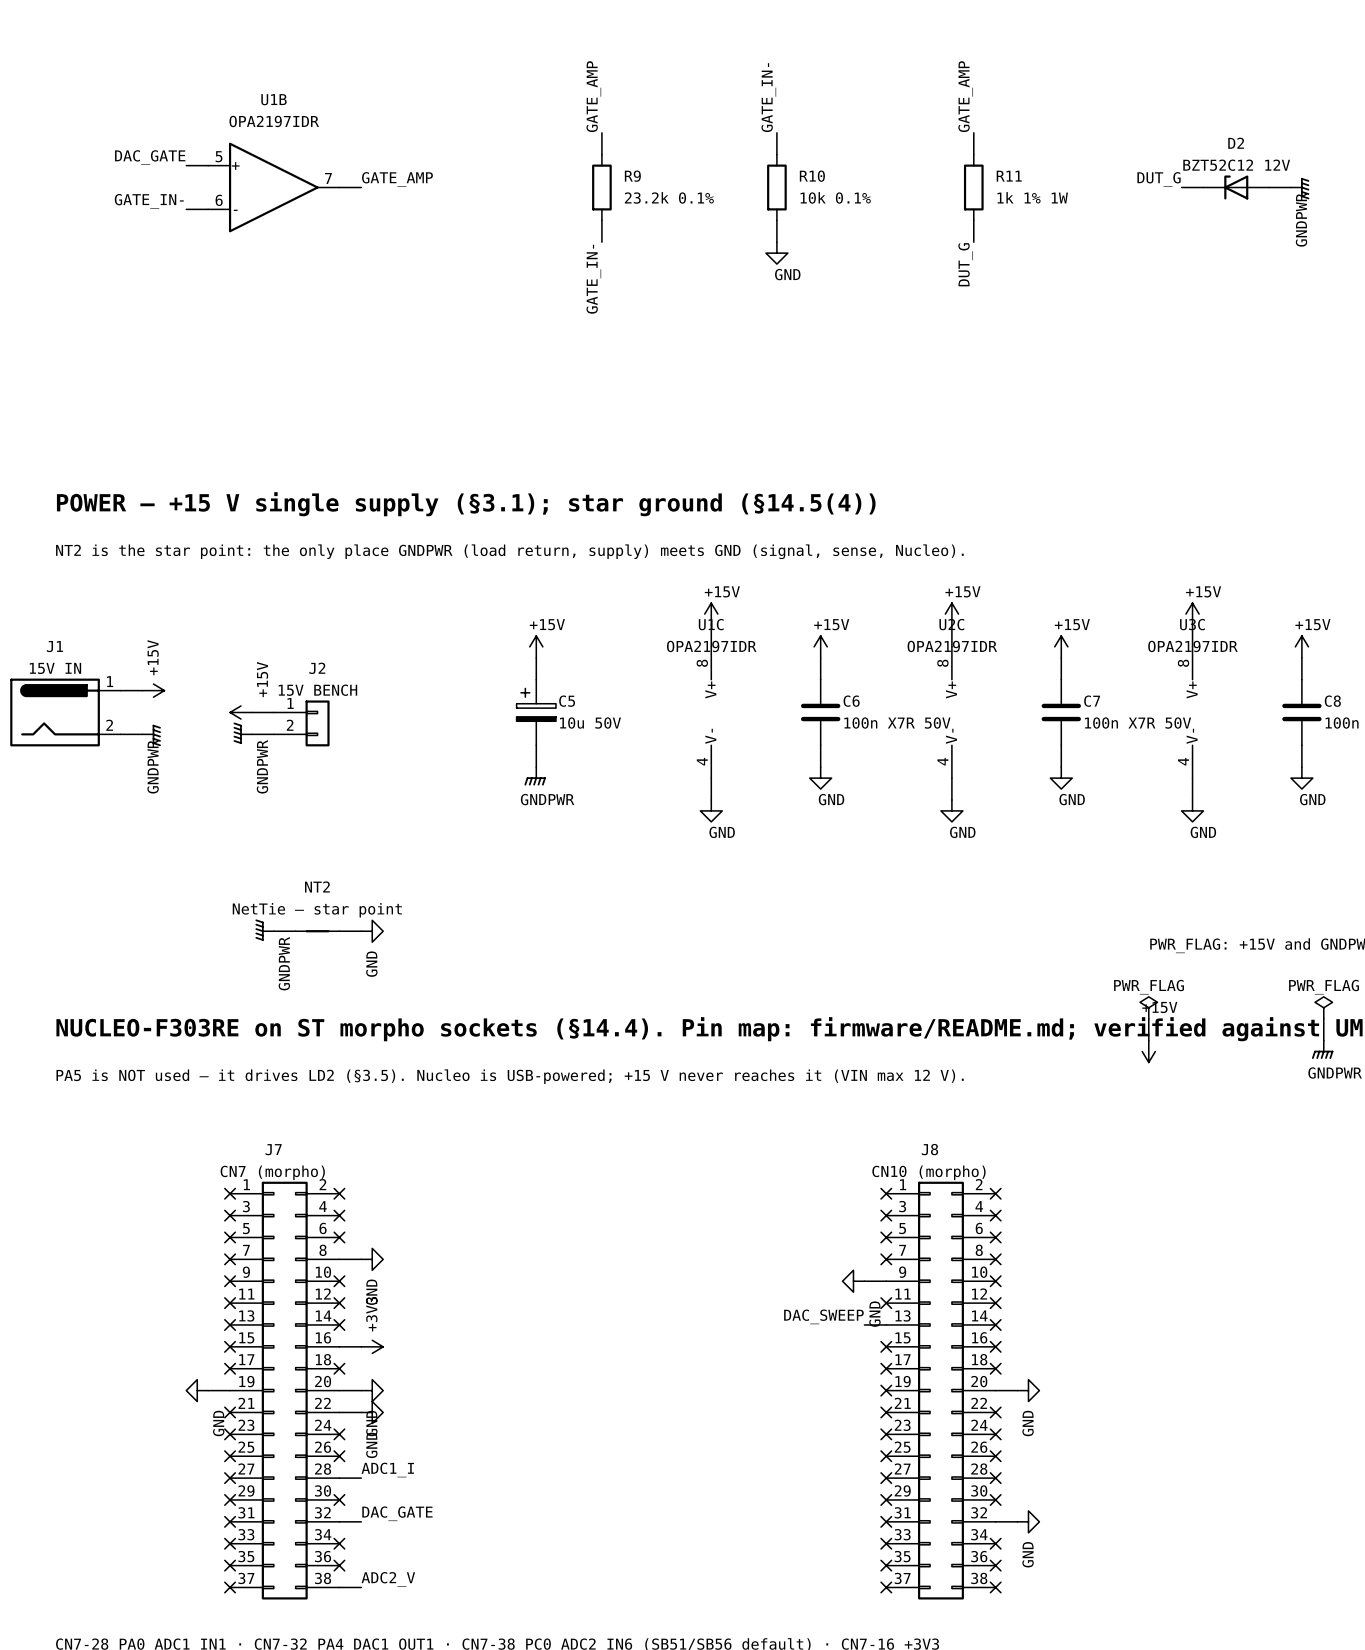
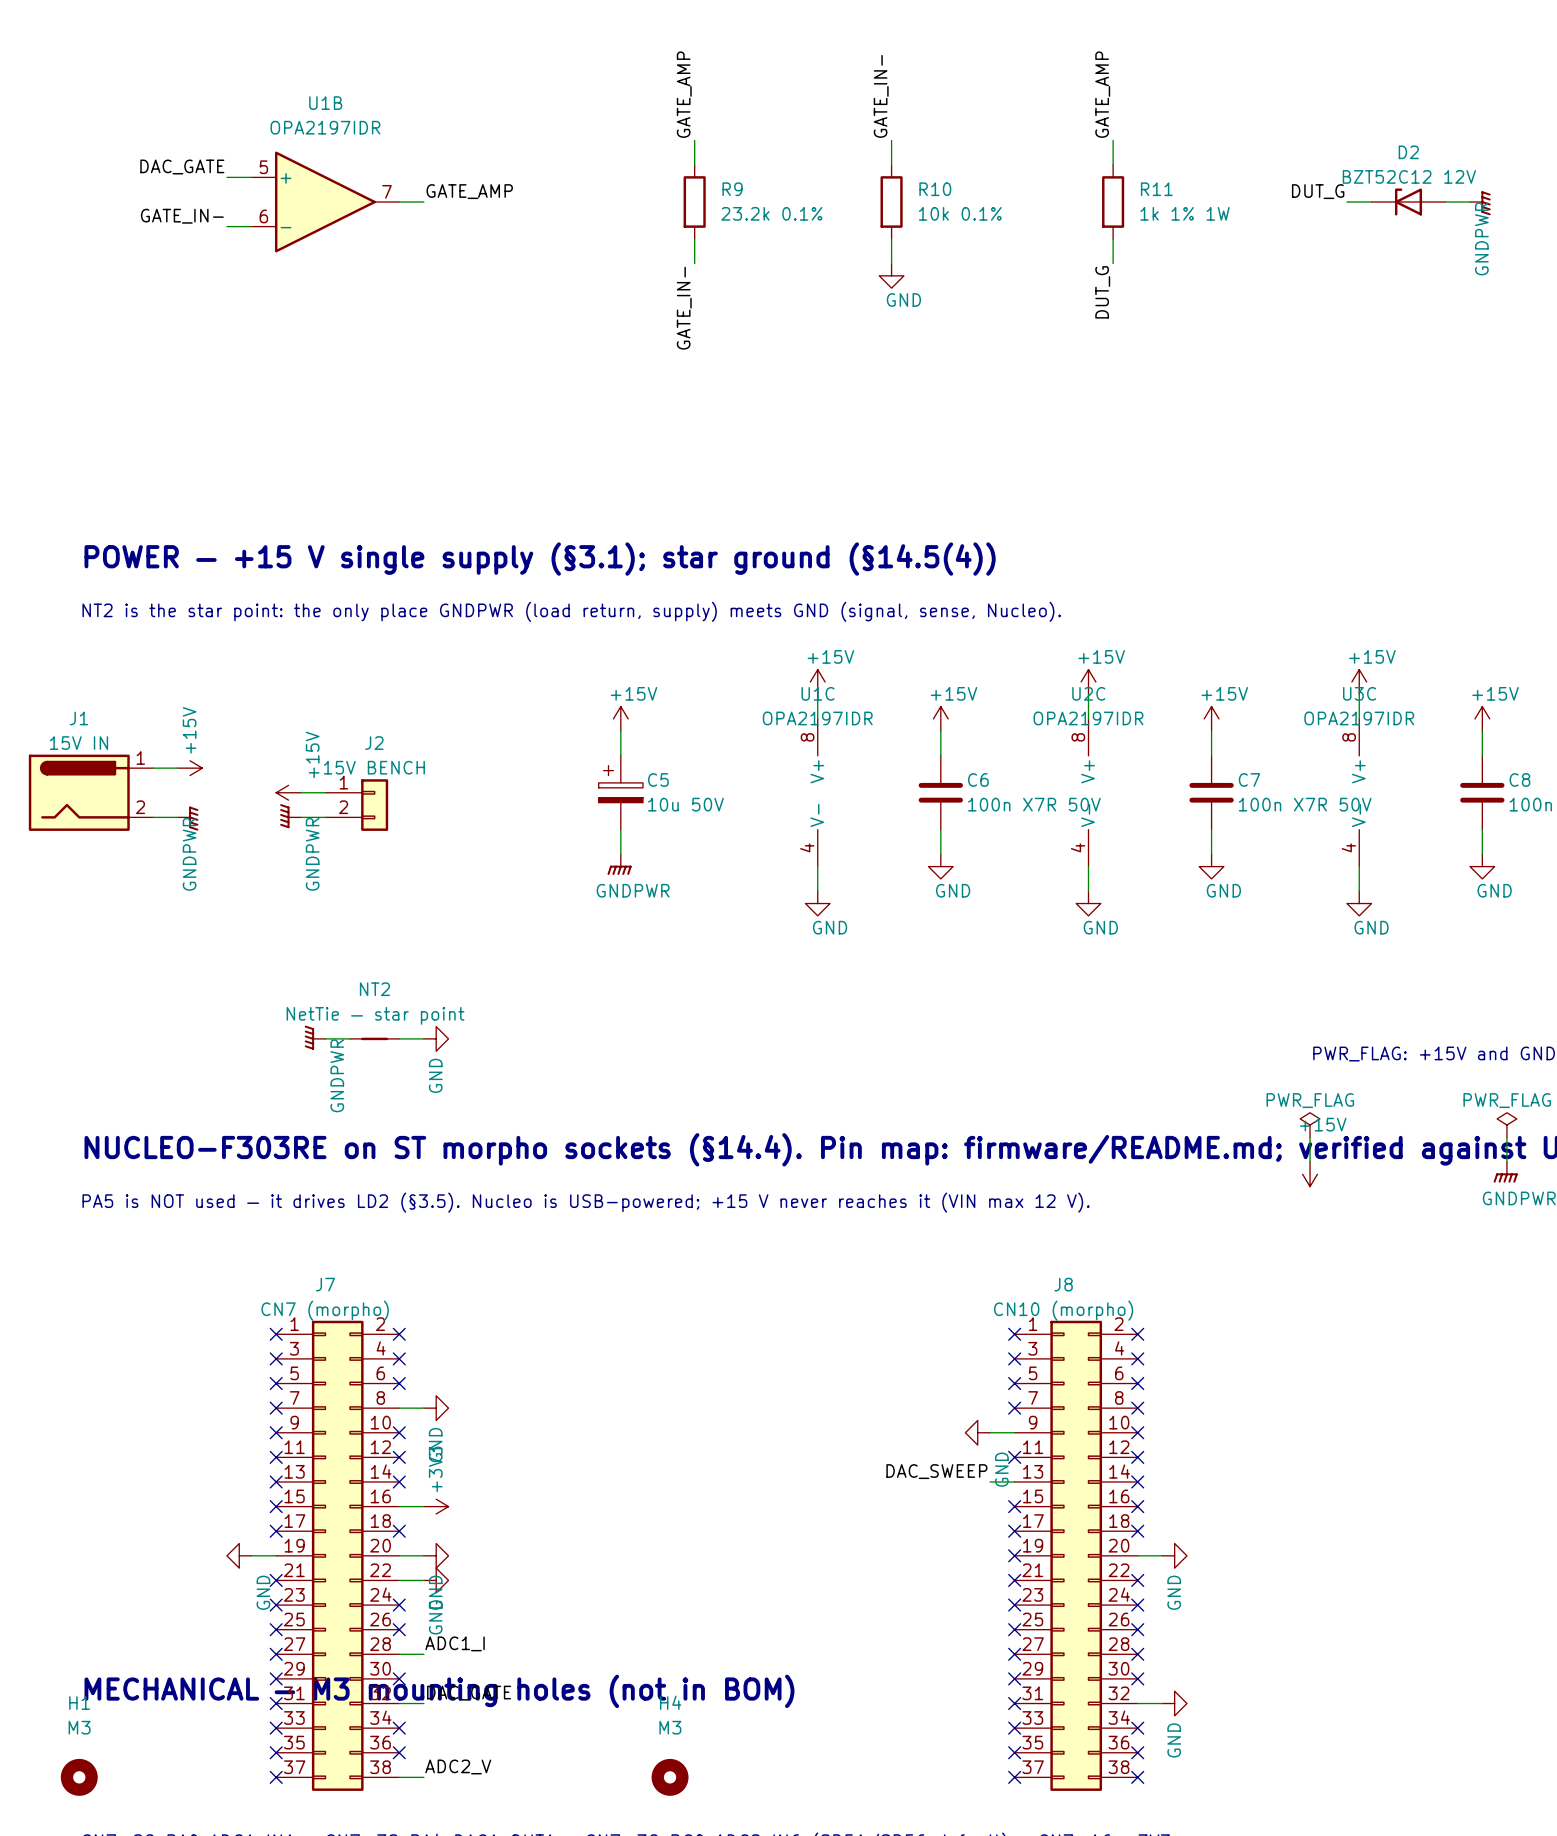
text: none -> MECHANICAL — M3 mounting holes (not in BOM) (439, 1691)
H1: none -> M3 (79, 1777)
H4: none -> M3 (670, 1777)

